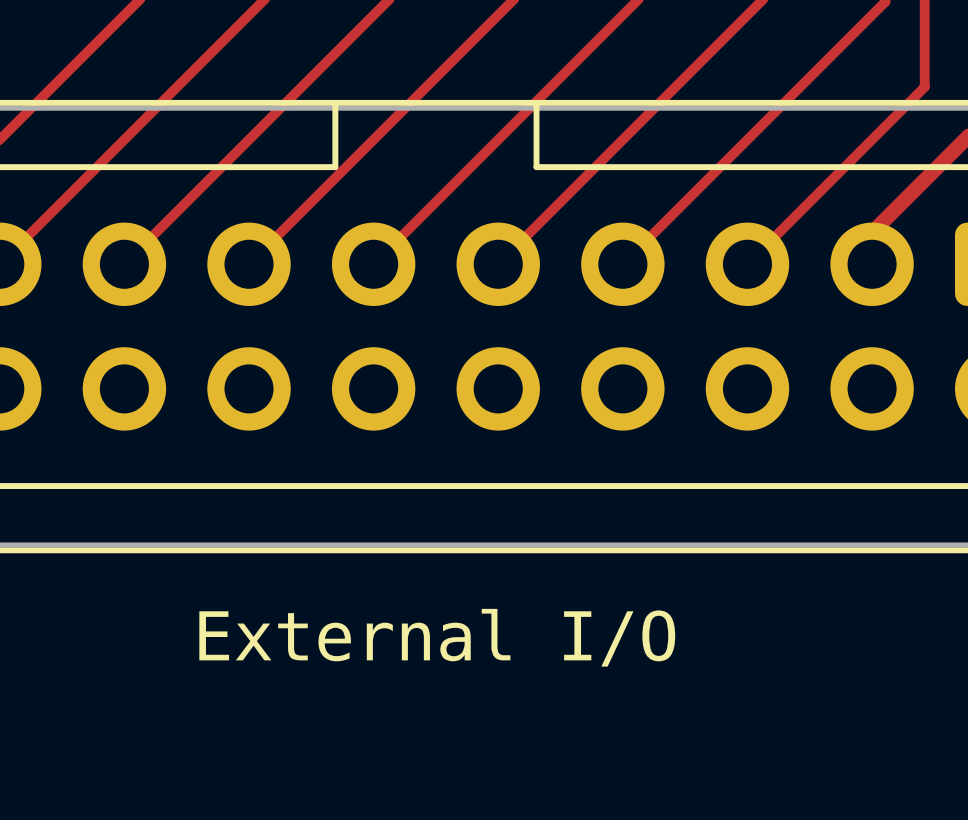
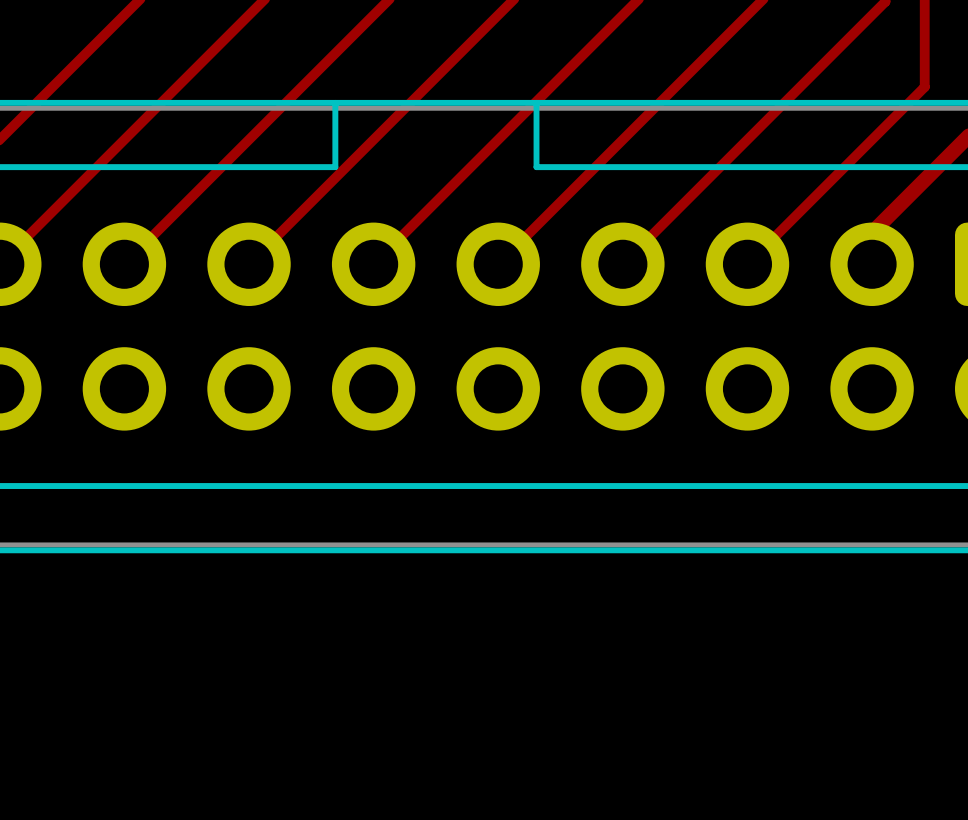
text: External I/O (437, 637) -> none

